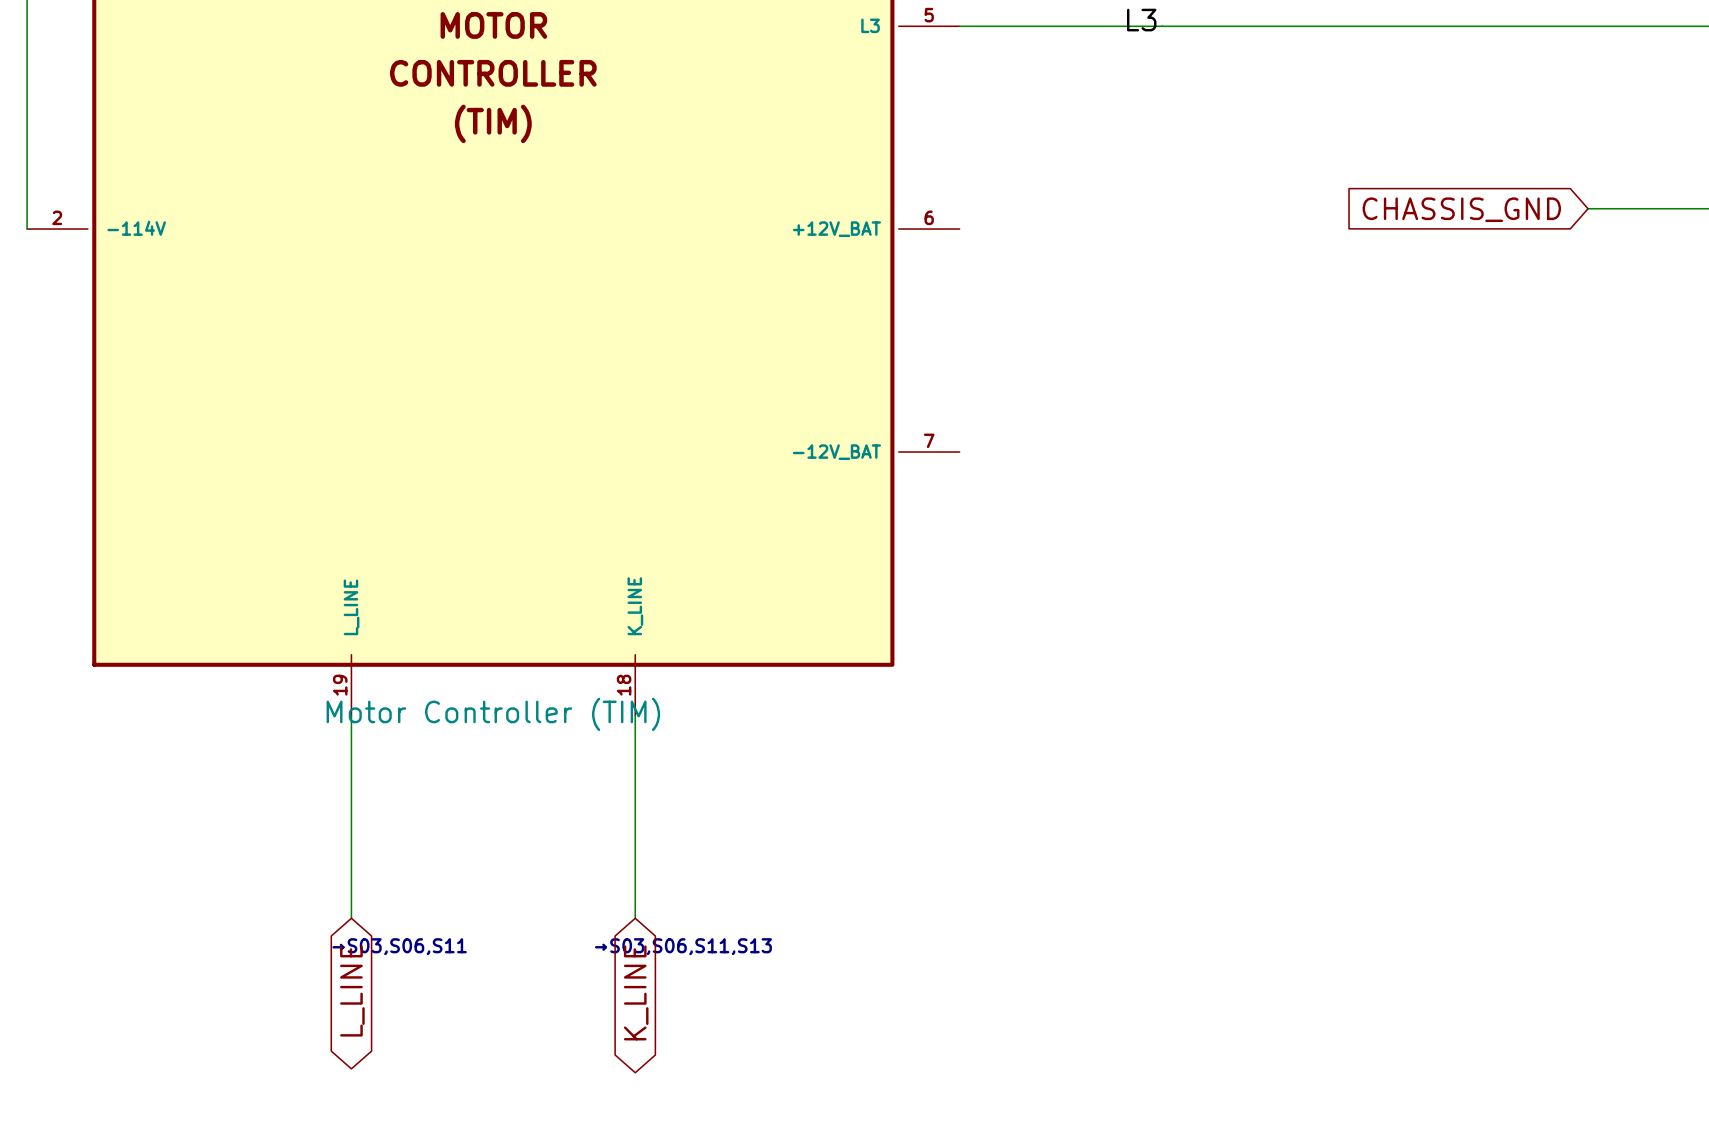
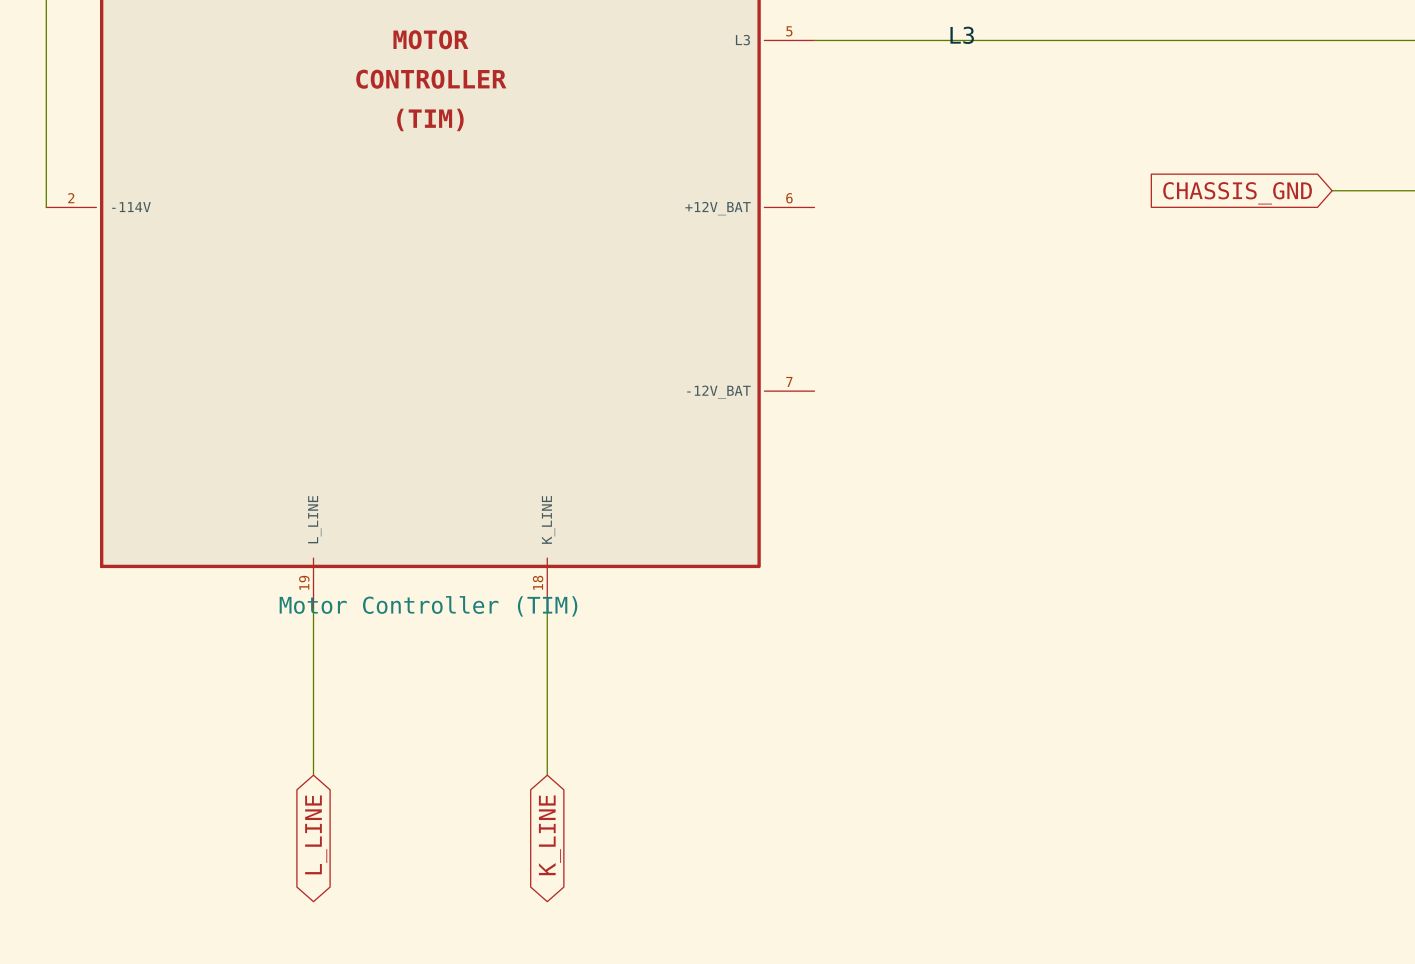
text: →S03,S06,S11 (399, 946) -> none
text: →S03,S06,S11,S13 (683, 946) -> none

